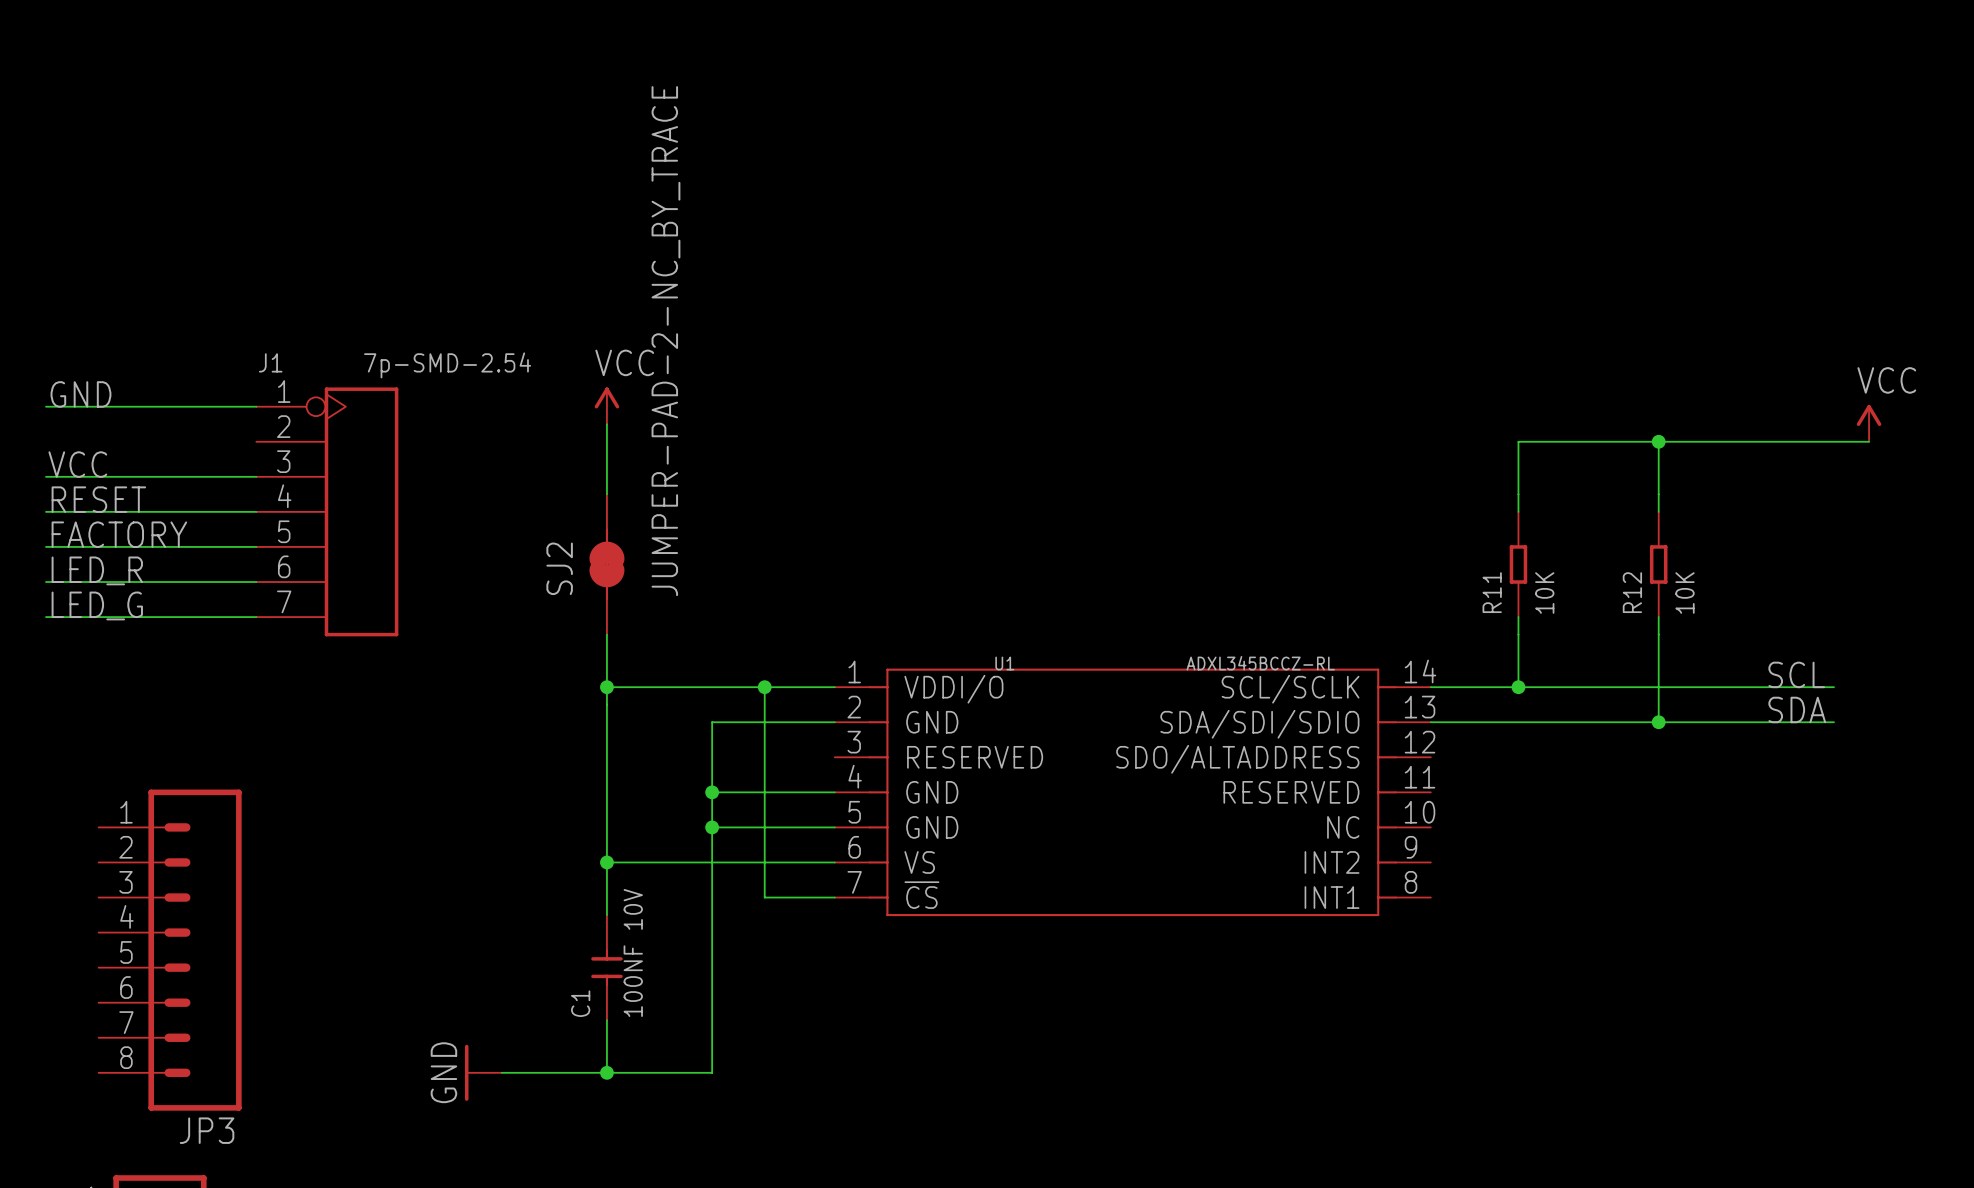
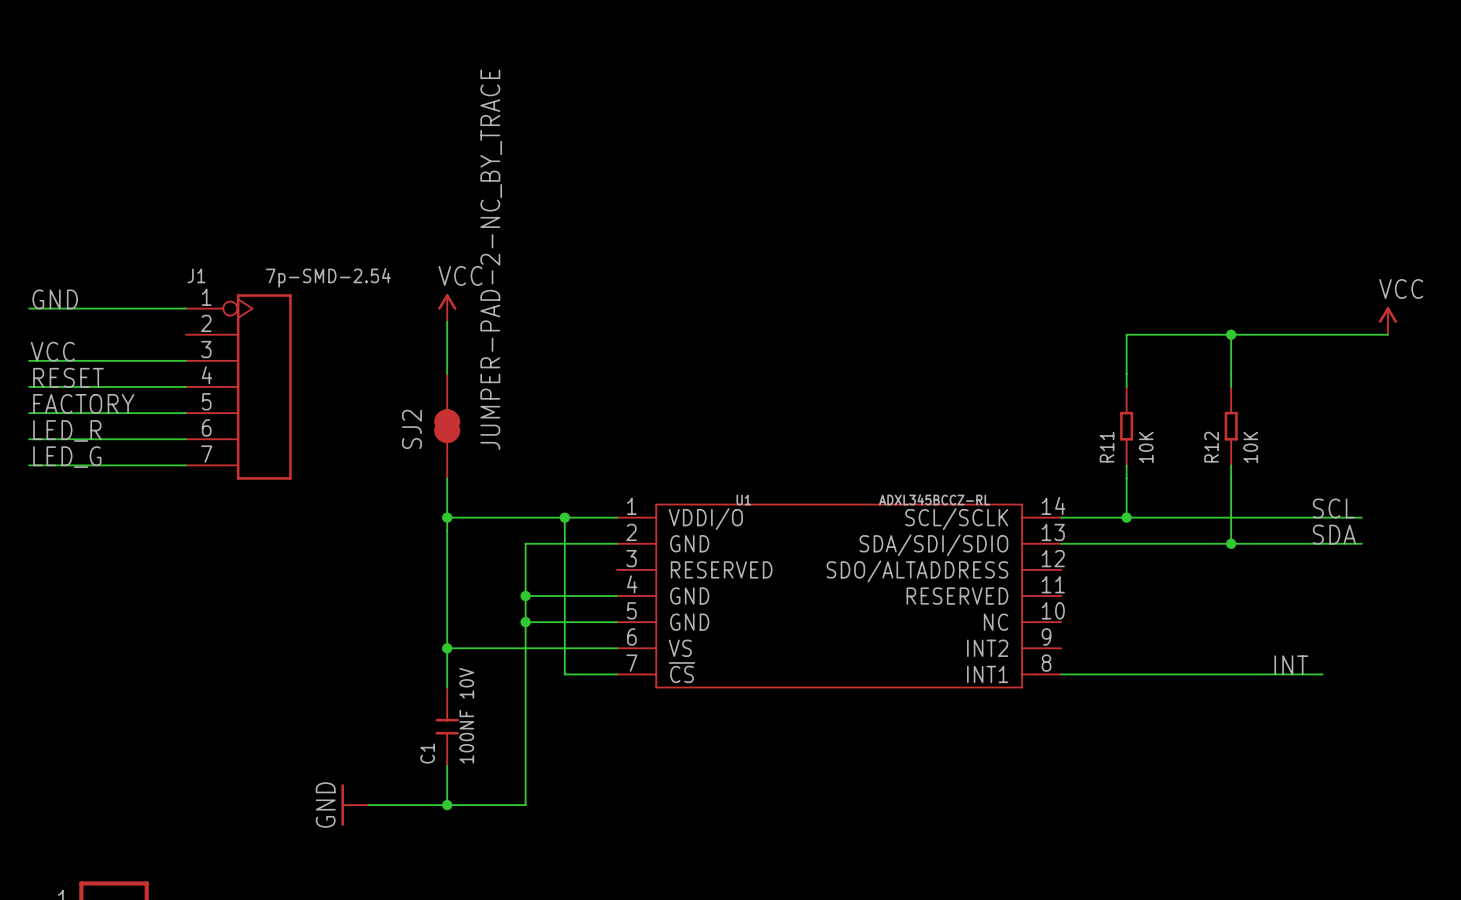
label: none -> INT (1291, 665)
wire: none -> (1061, 674) (1322, 674)
JP3: (170, 950) -> none

